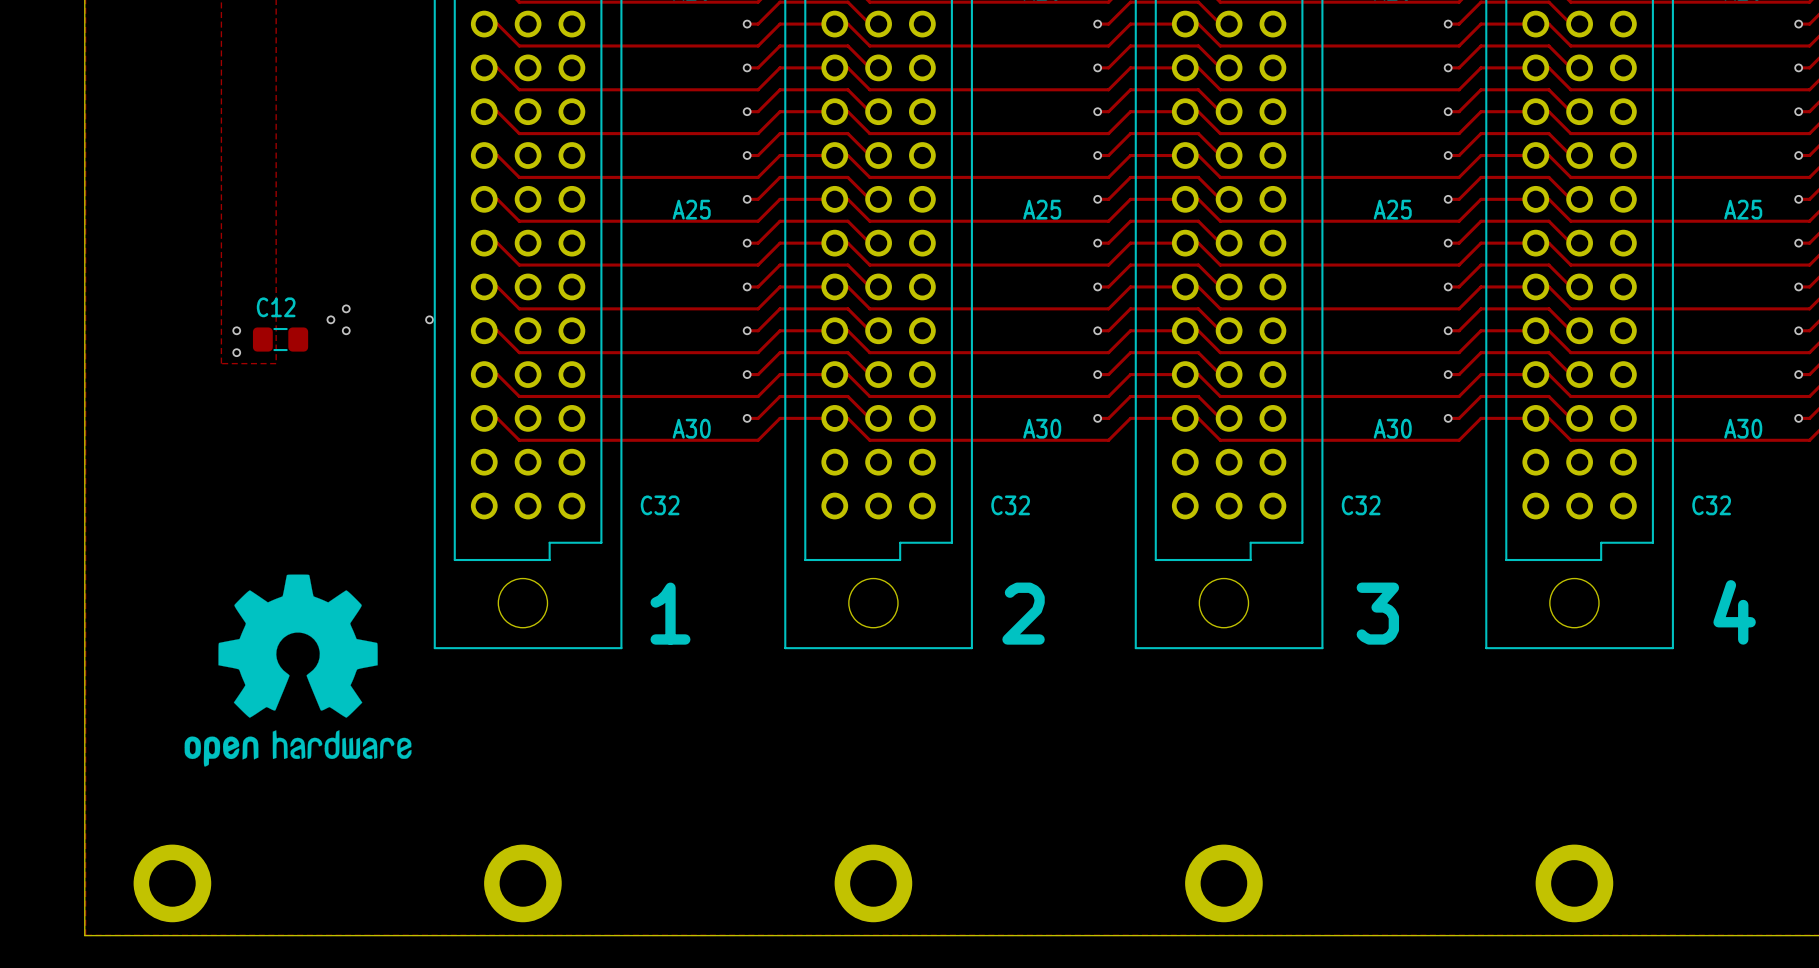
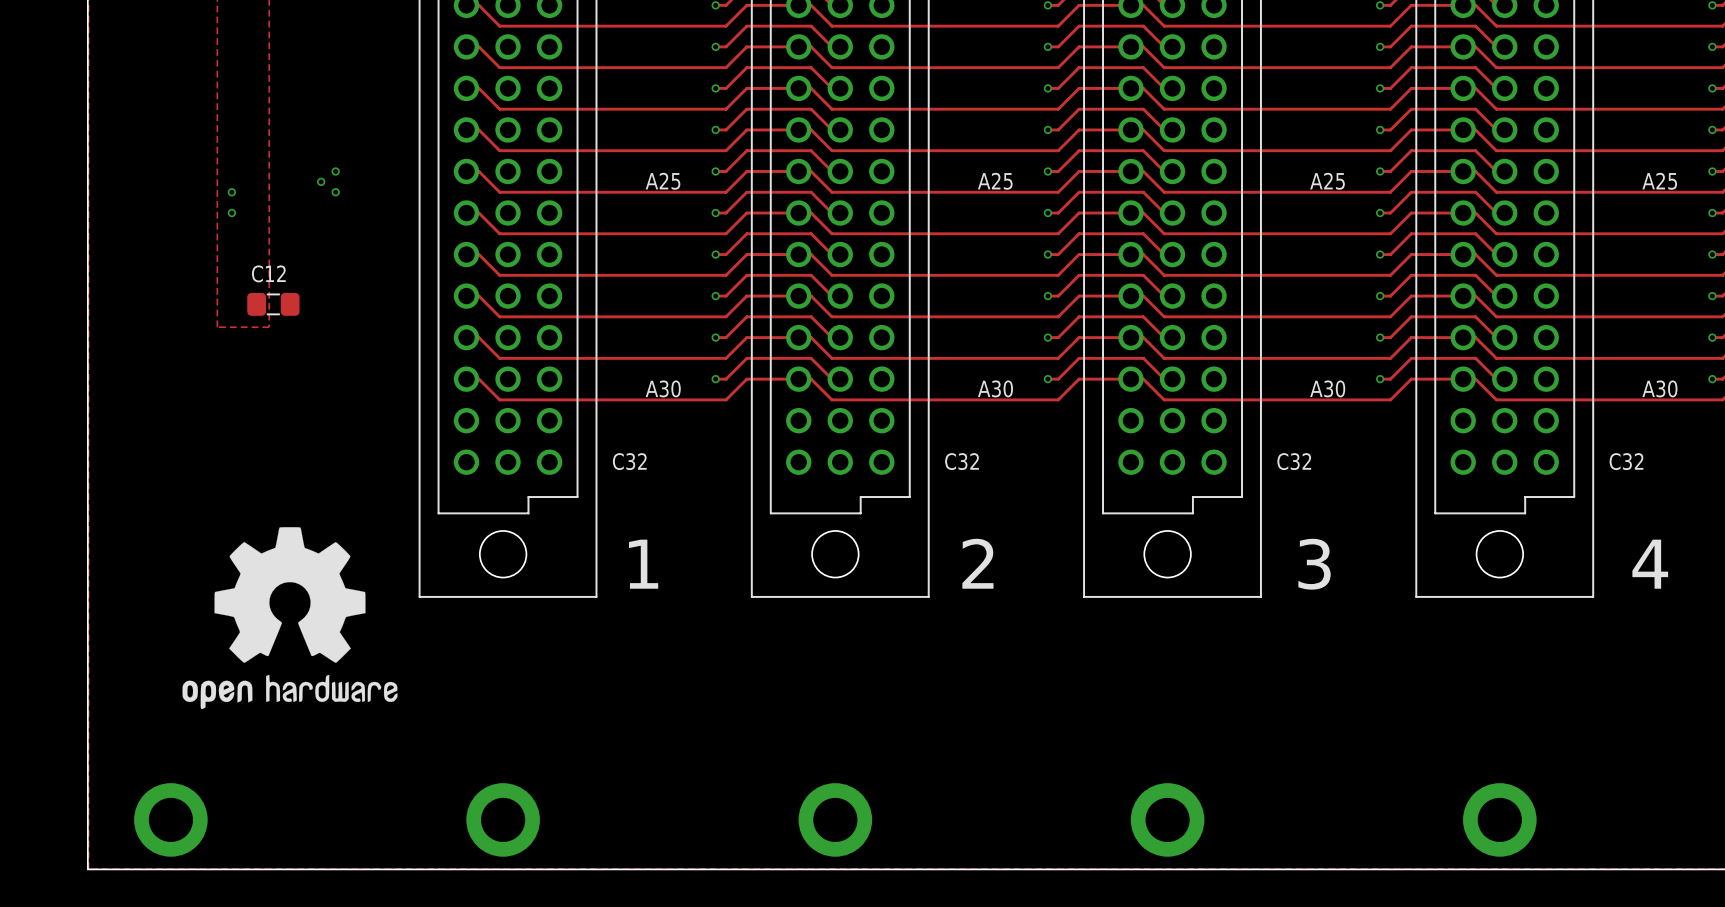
via: none -> (335, 171)
via: none -> (321, 181)
via: none -> (231, 192)
via: none -> (335, 192)
via: none -> (231, 213)
via: (346, 308) -> none
via: (330, 319) -> none
via: (429, 319) -> none
via: (236, 330) -> none
via: (346, 330) -> none
via: (236, 352) -> none

